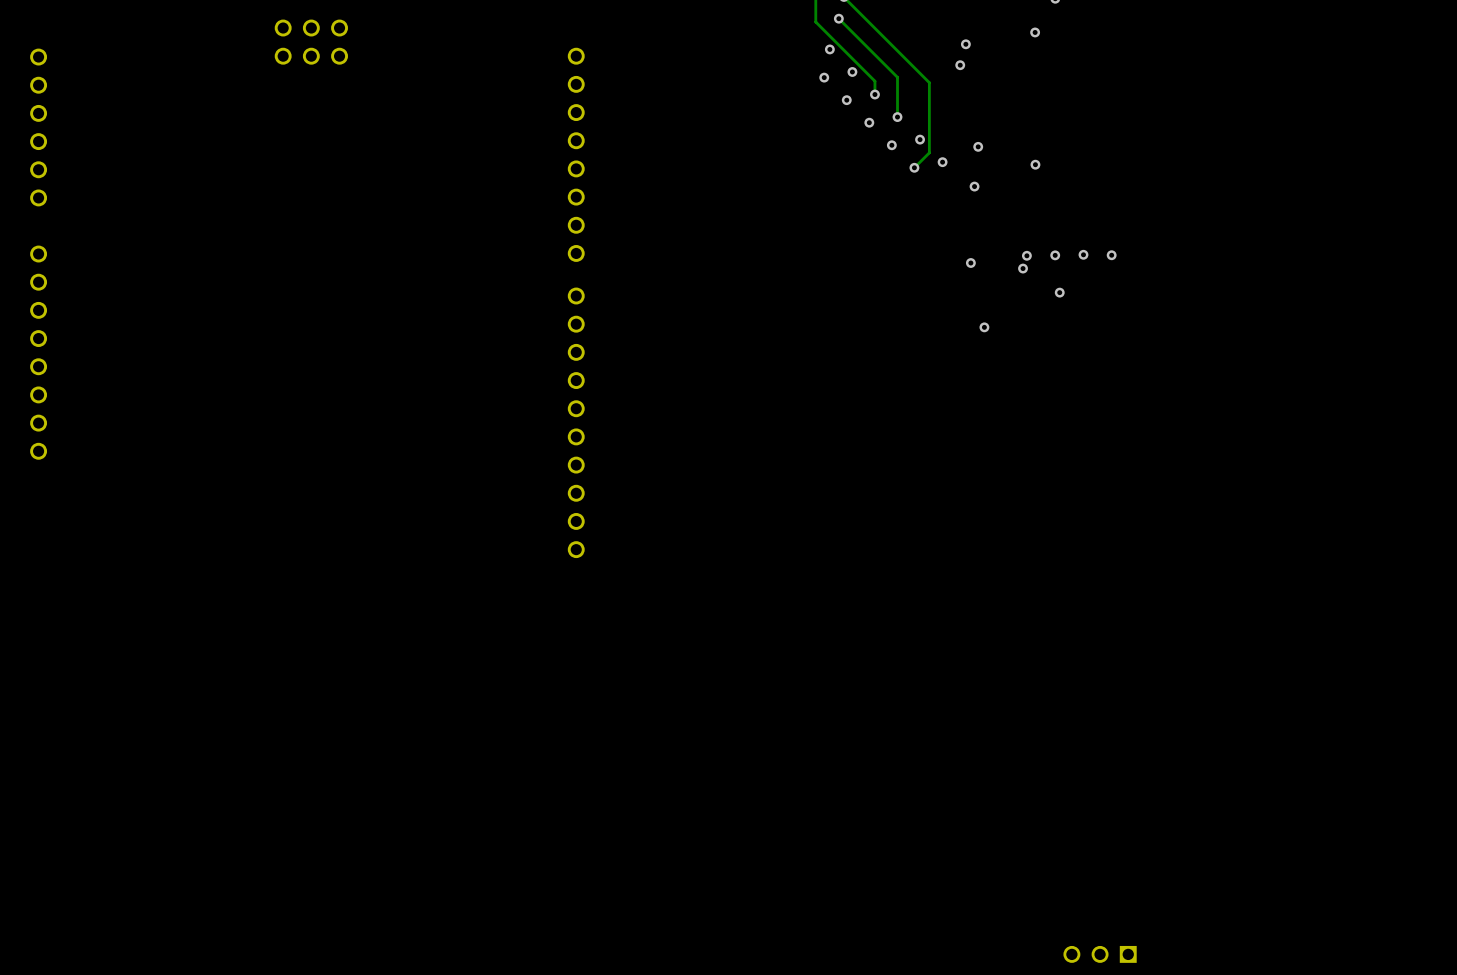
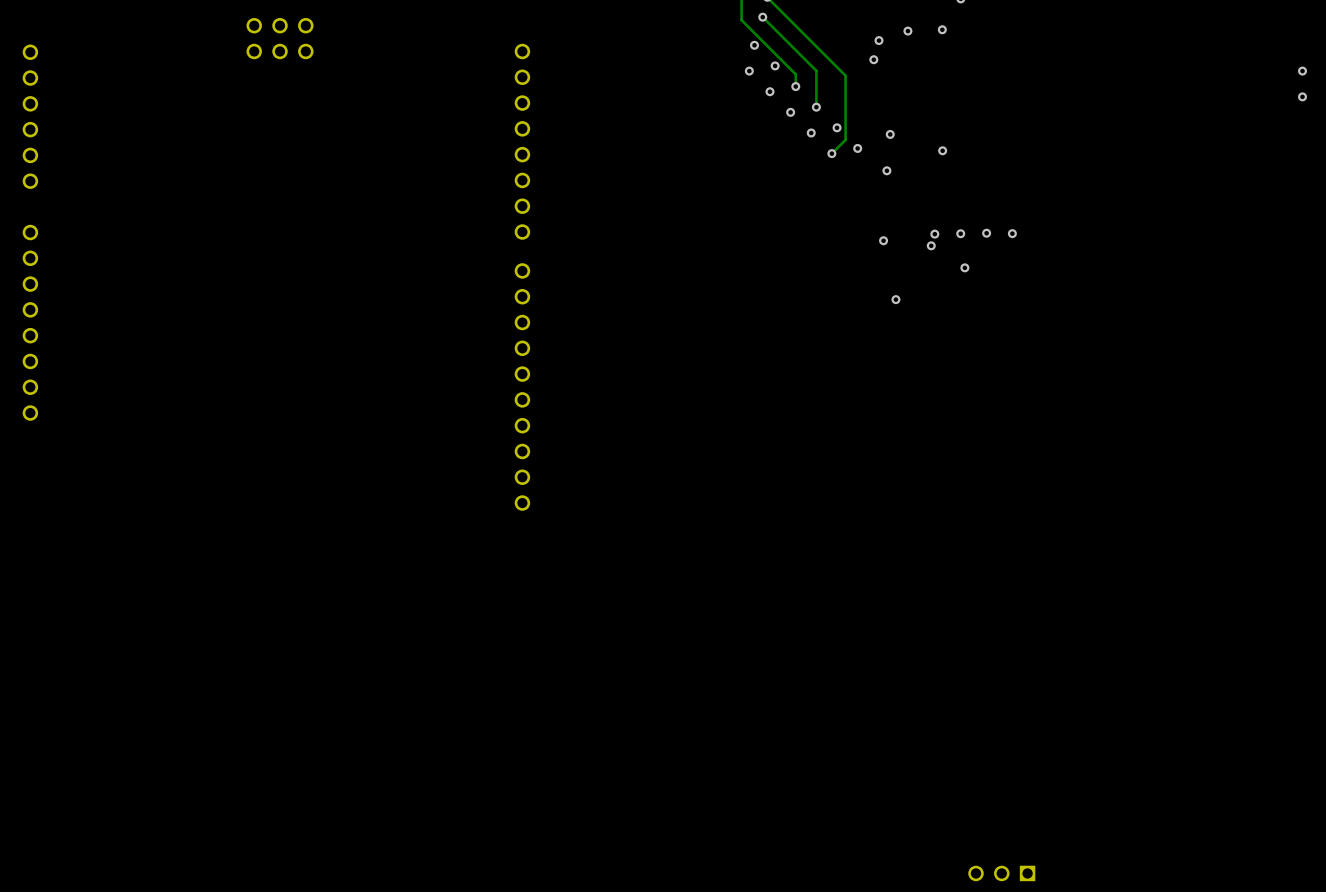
via: none -> (907, 31)
via: none -> (1302, 71)
via: none -> (1302, 96)

